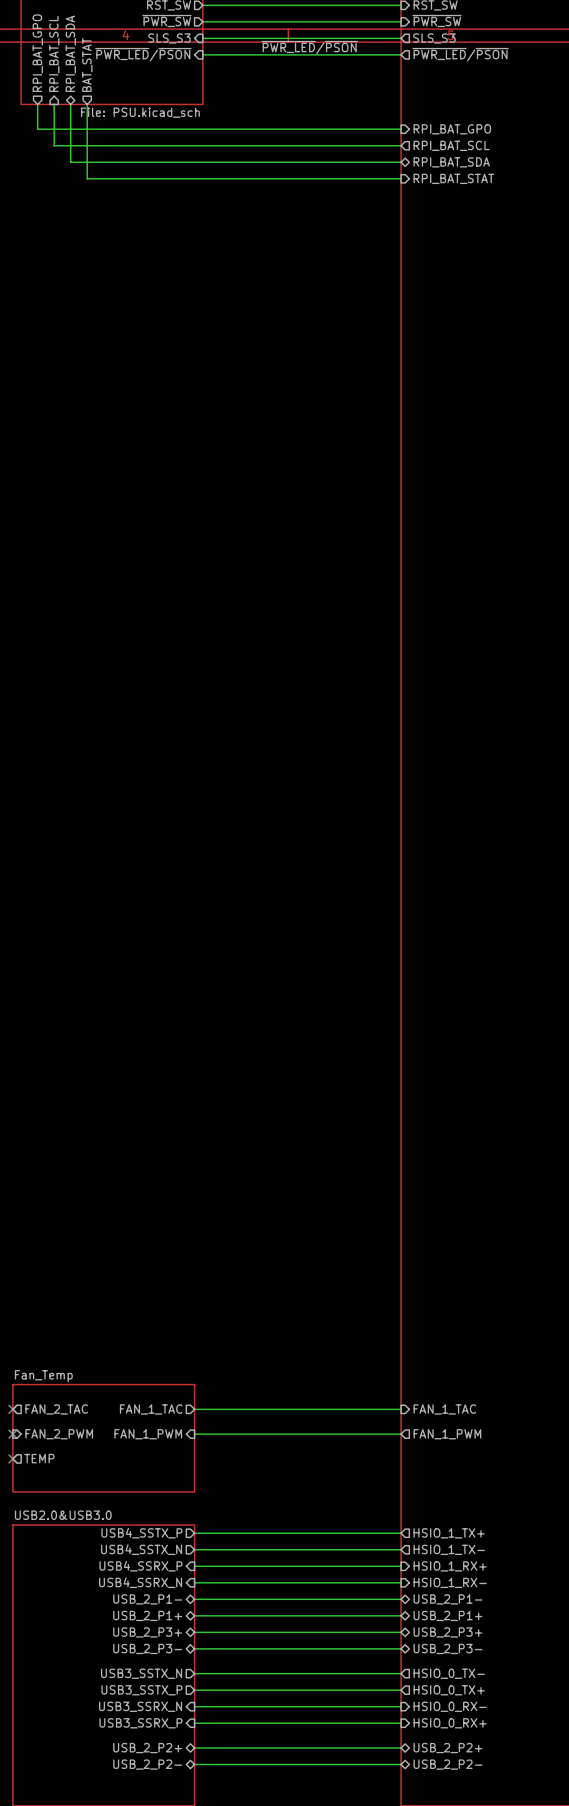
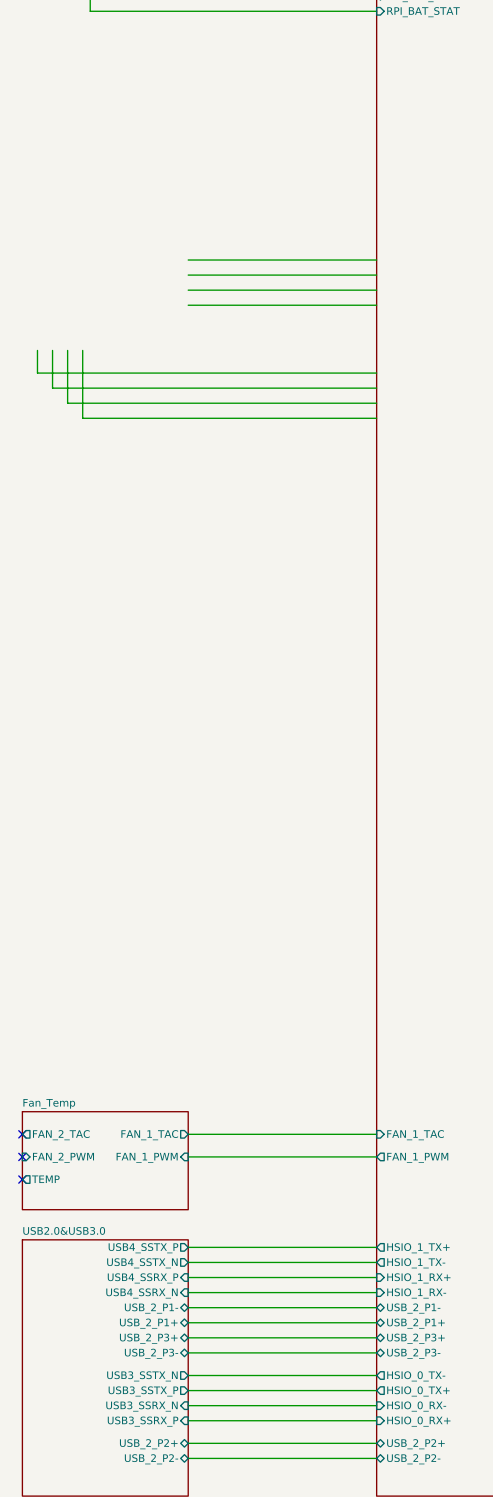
wire: none -> (188, 260) (376, 260)
wire: none -> (188, 275) (376, 275)
wire: none -> (188, 290) (376, 290)
wire: none -> (188, 305) (376, 305)
wire: none -> (37, 350) (37, 373) (376, 373)
wire: none -> (52, 350) (52, 388) (376, 388)
wire: none -> (67, 350) (67, 403) (376, 403)
wire: none -> (82, 350) (82, 418) (376, 418)

